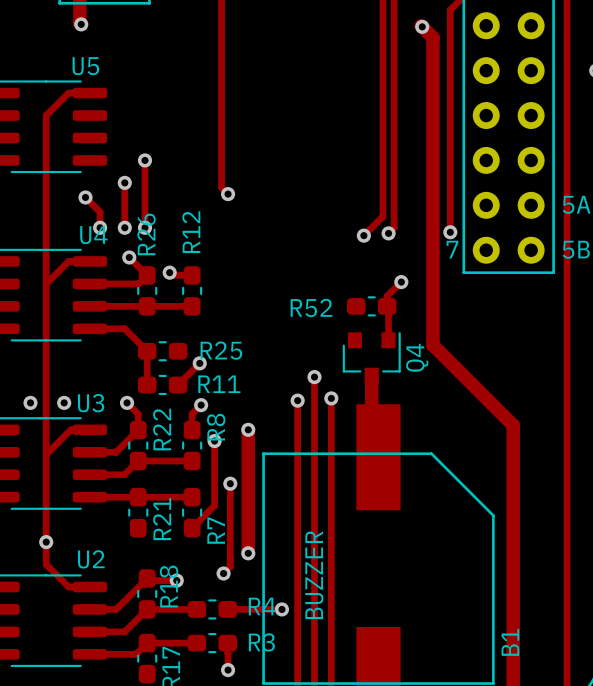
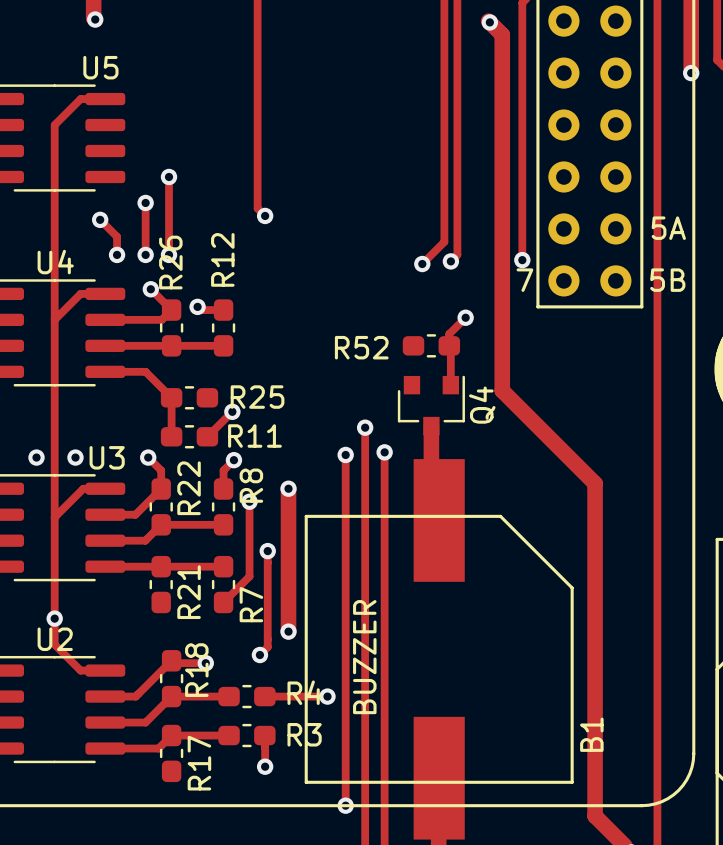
U4 name position: U4 (93, 235) -> U4 (55, 262)
U2 name position: U2 (91, 559) -> U2 (55, 639)

